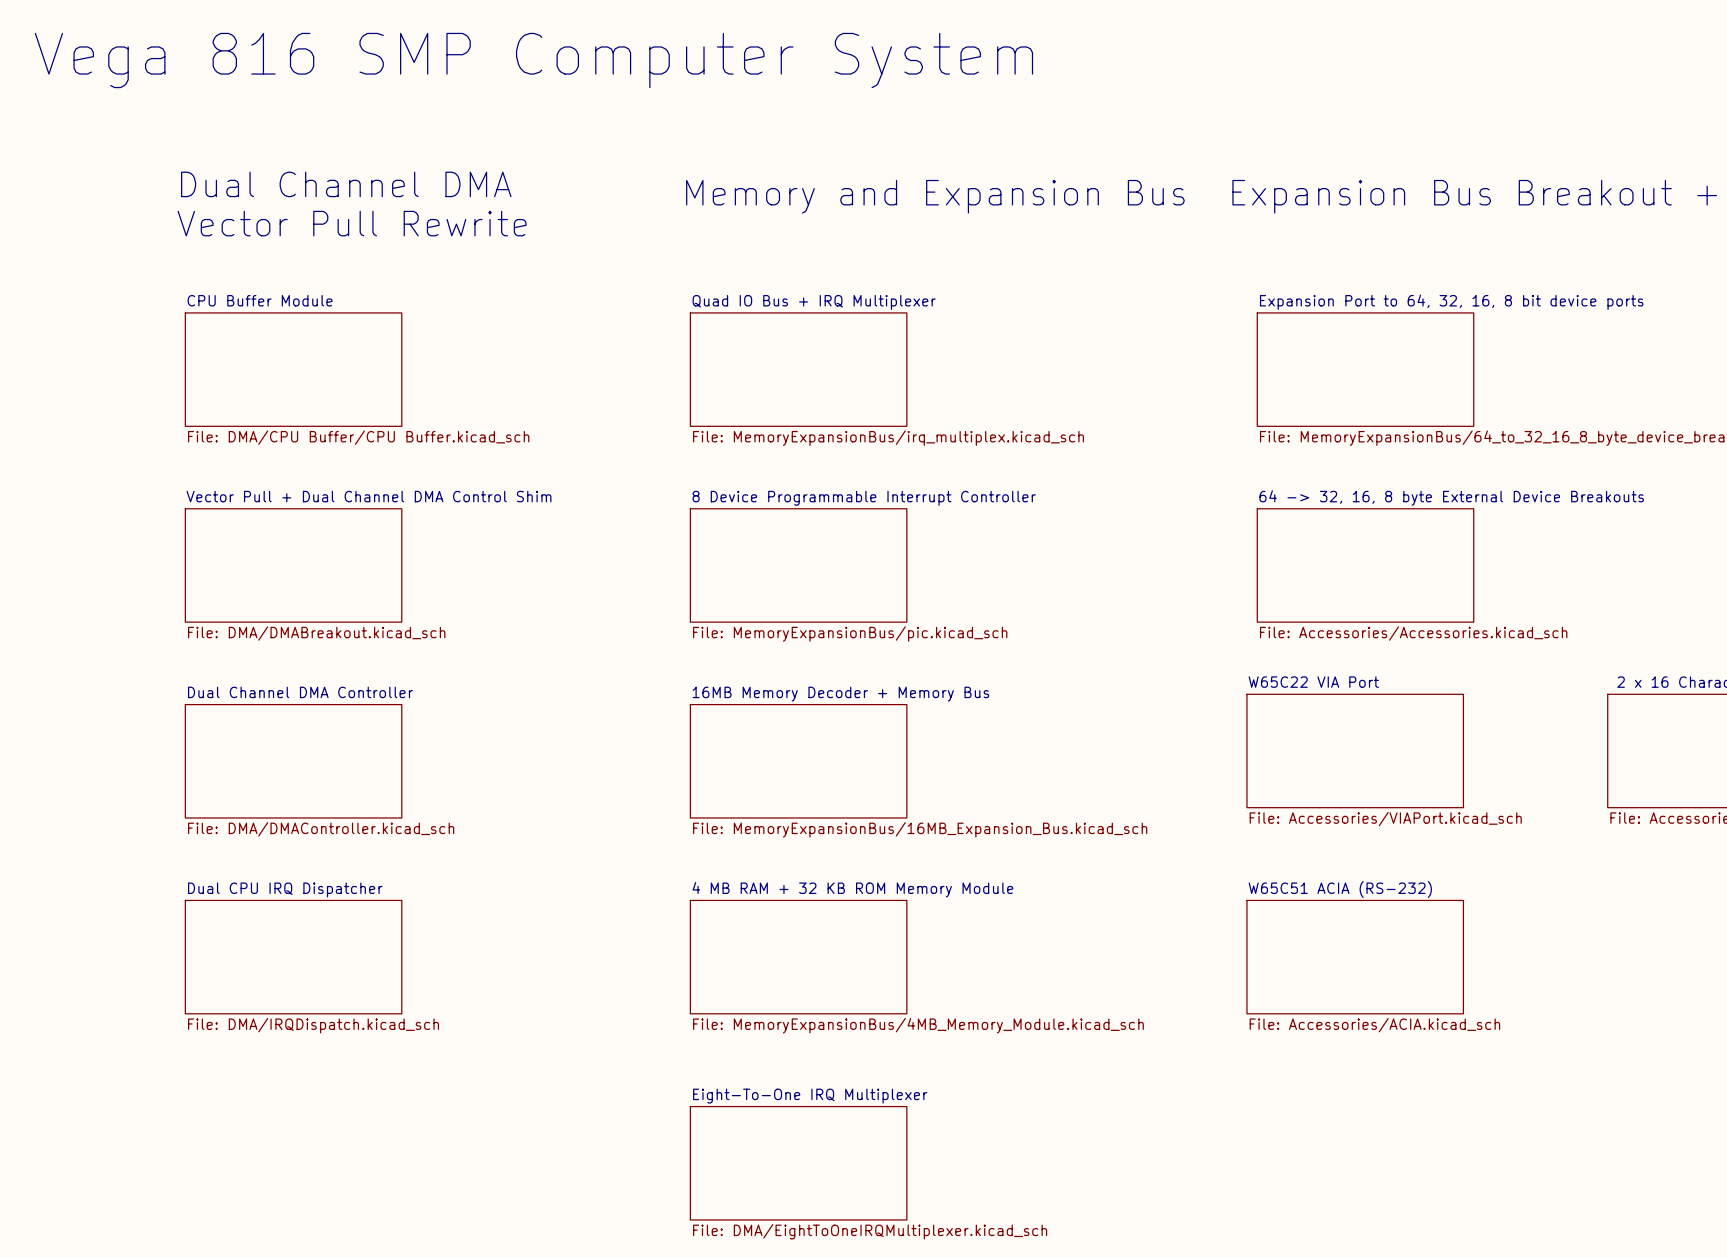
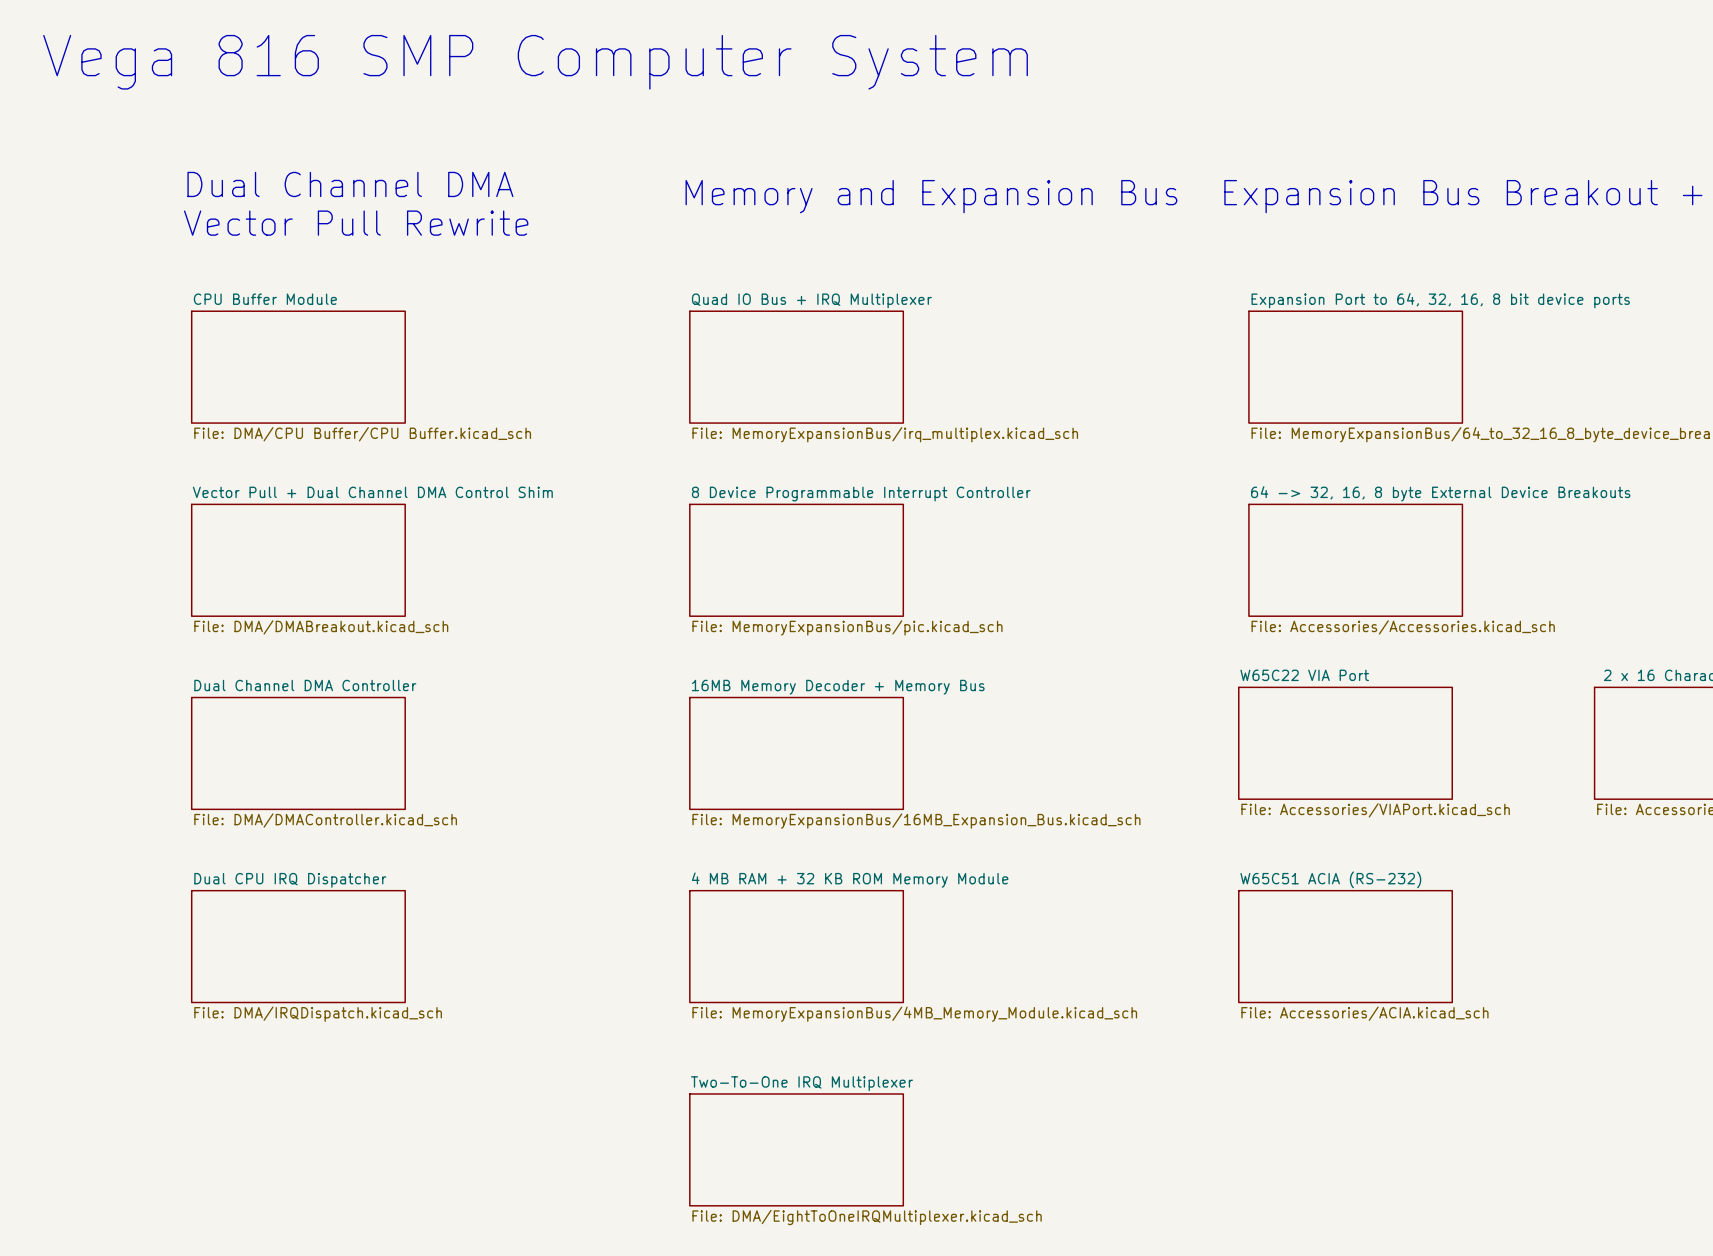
sheet Eight-To-One IRQ Multiplexer name: Eight-To-One IRQ Multiplexer (810, 1096) -> Two-To-One IRQ Multiplexer (801, 1083)

